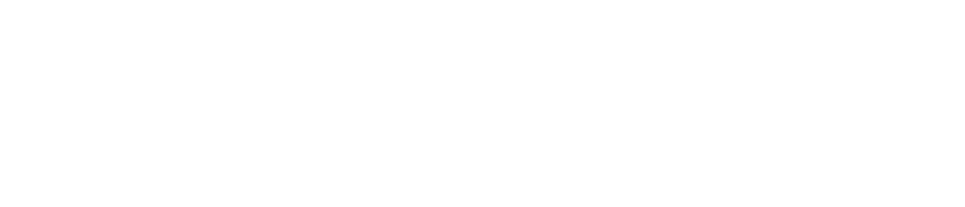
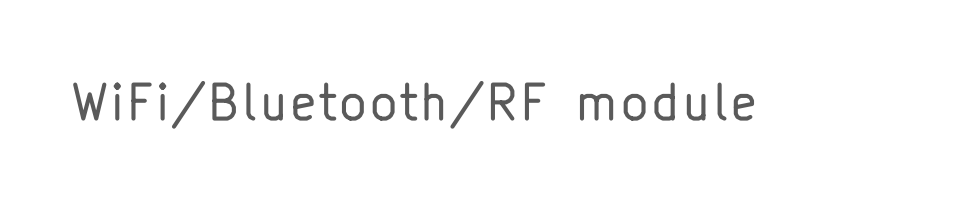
text: none -> WiFi/Bluetooth/RF module (413, 104)

